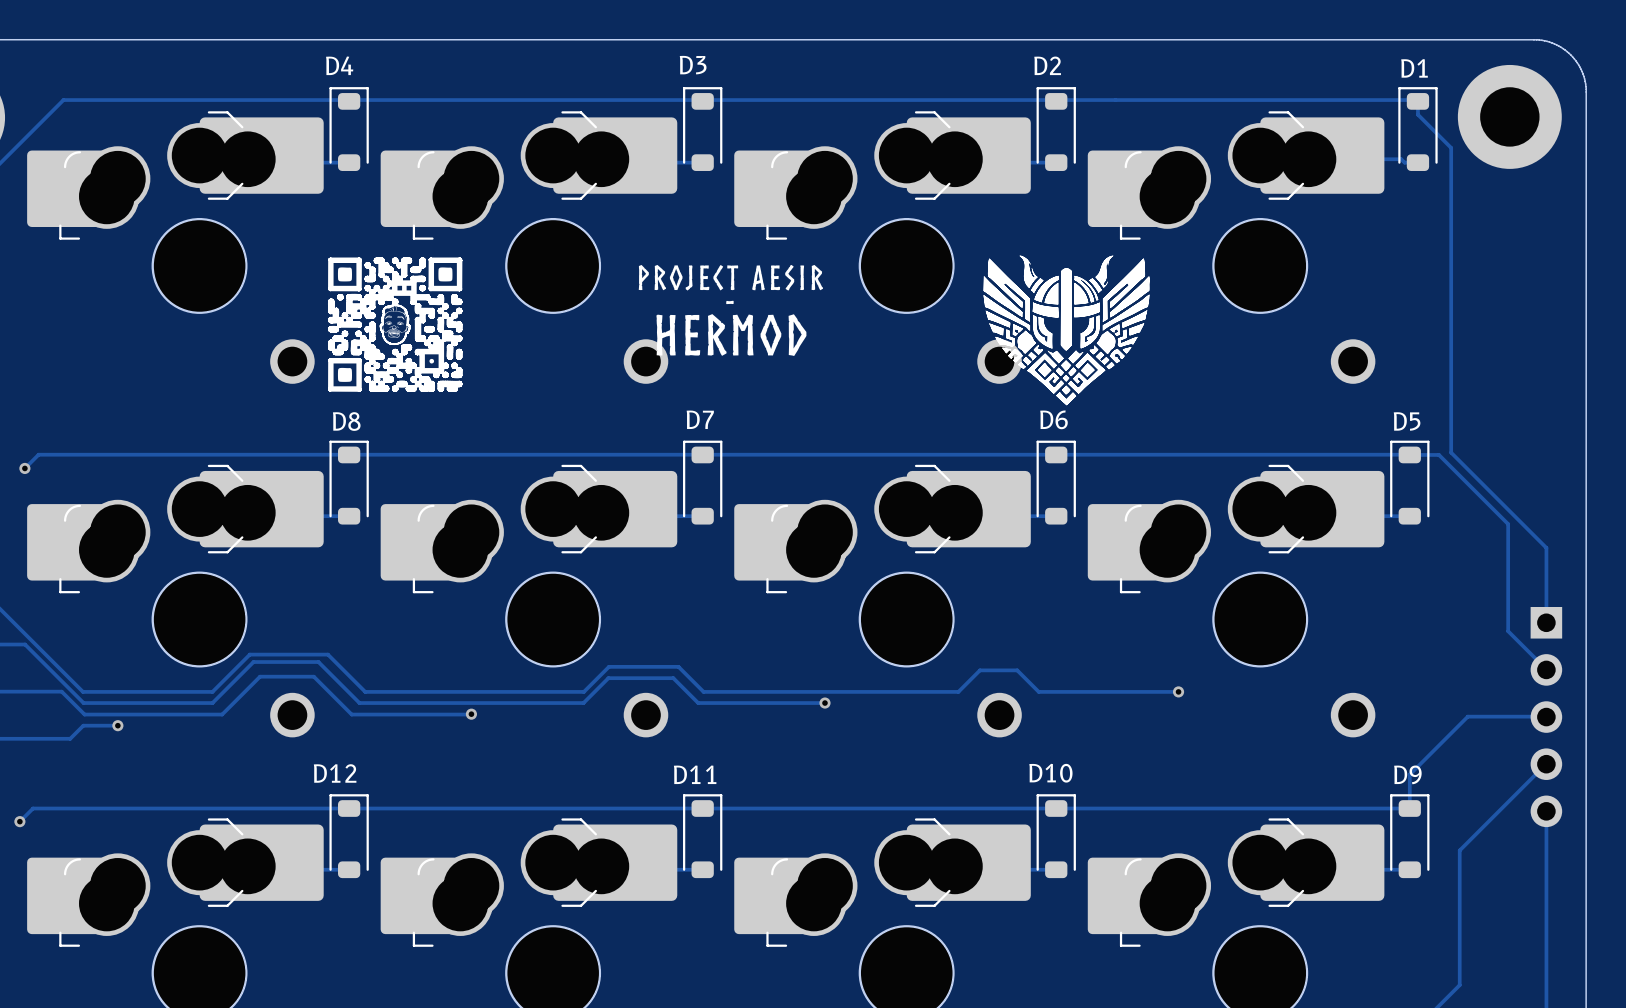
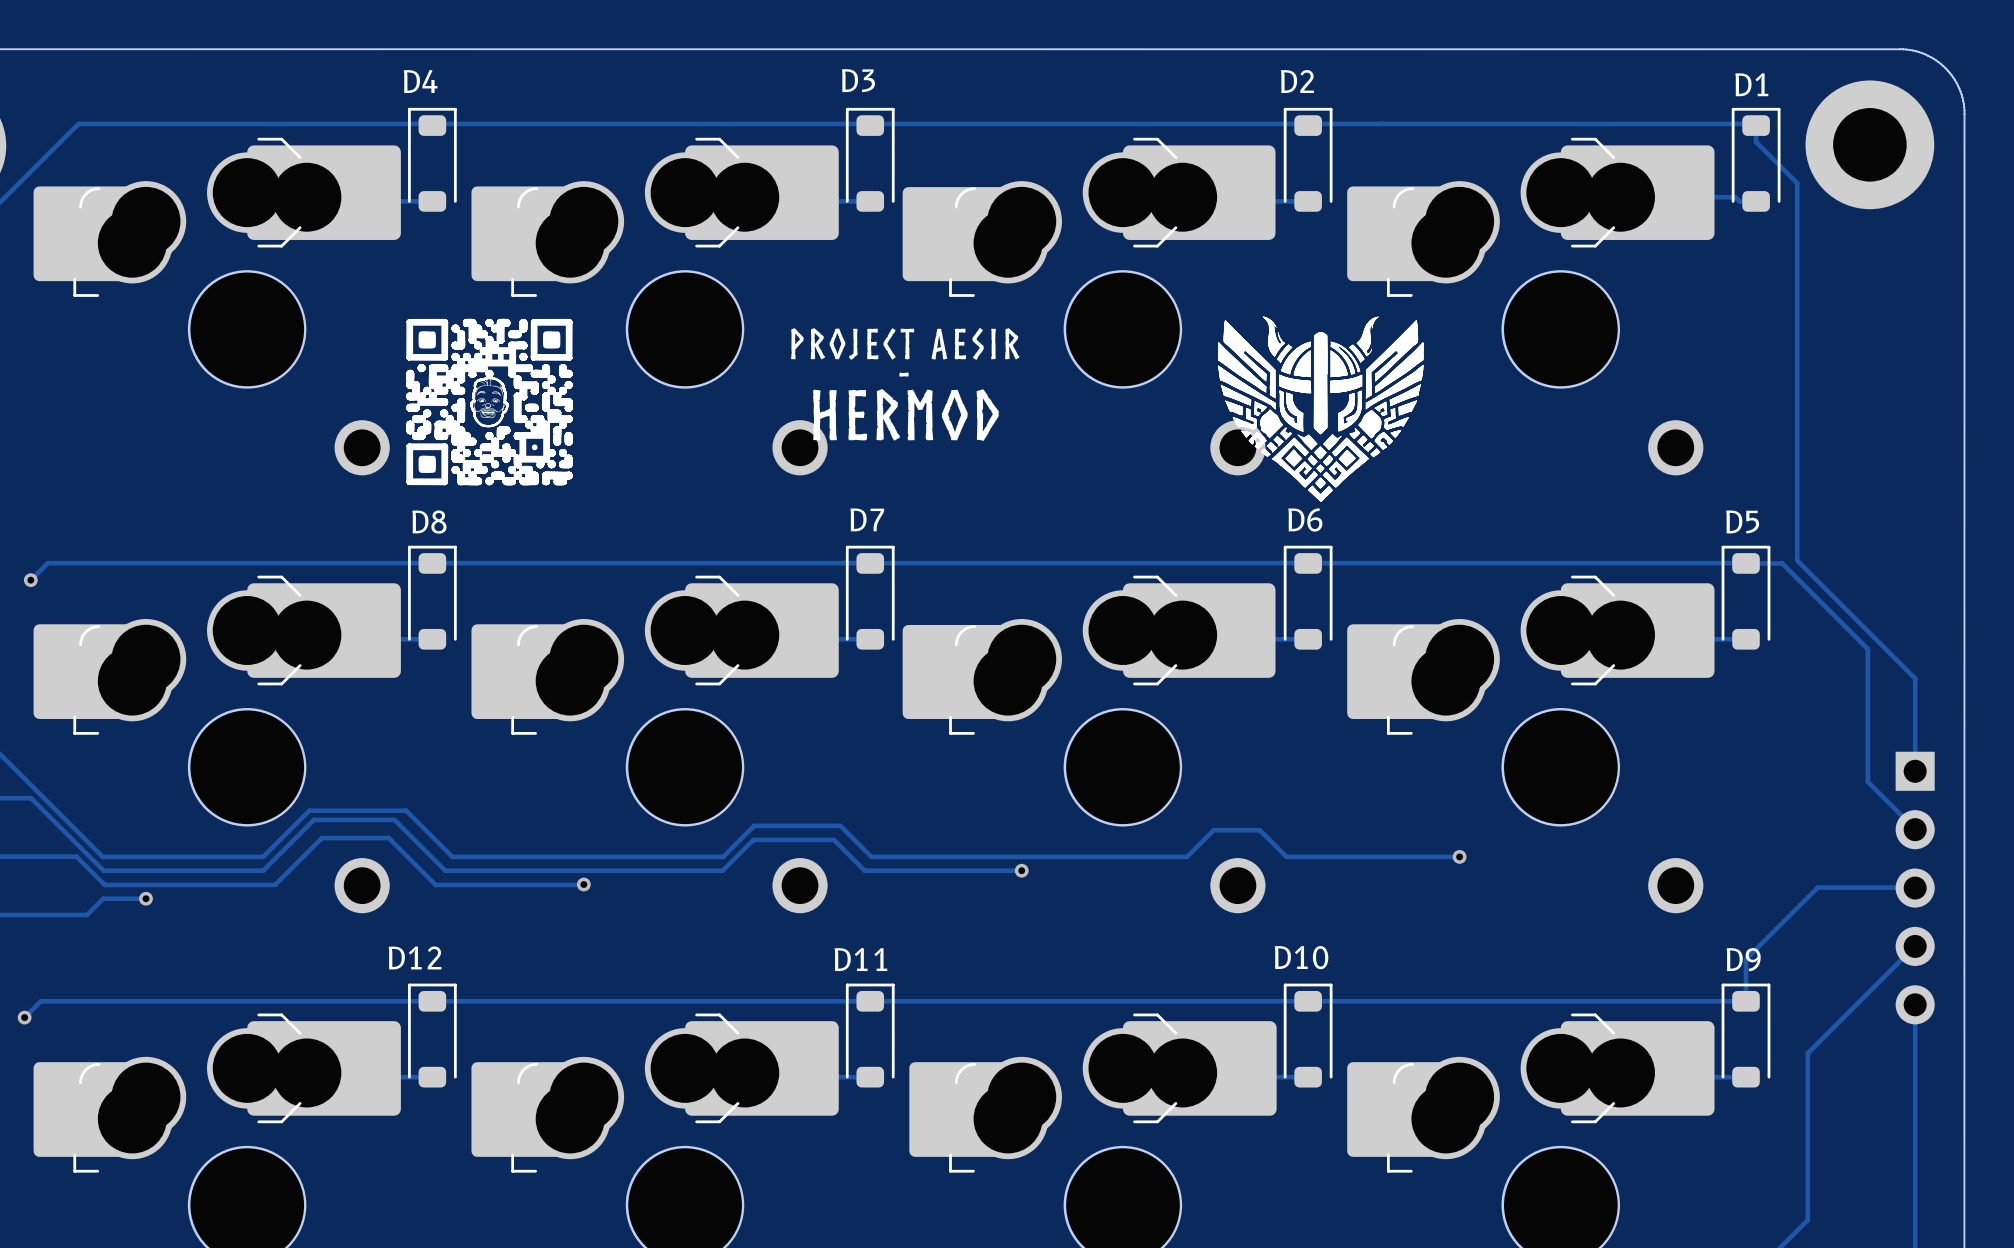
part footprint: [734, 111, 1031, 384] -> [902, 137, 1276, 476]
part footprint: [734, 464, 1031, 738] -> [902, 575, 1276, 914]

